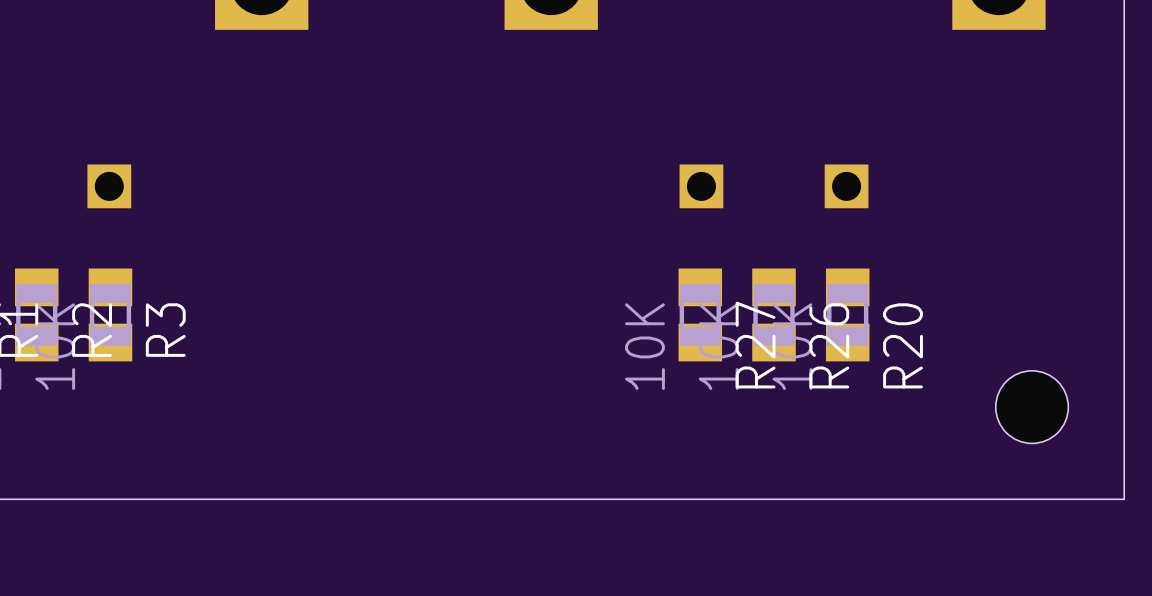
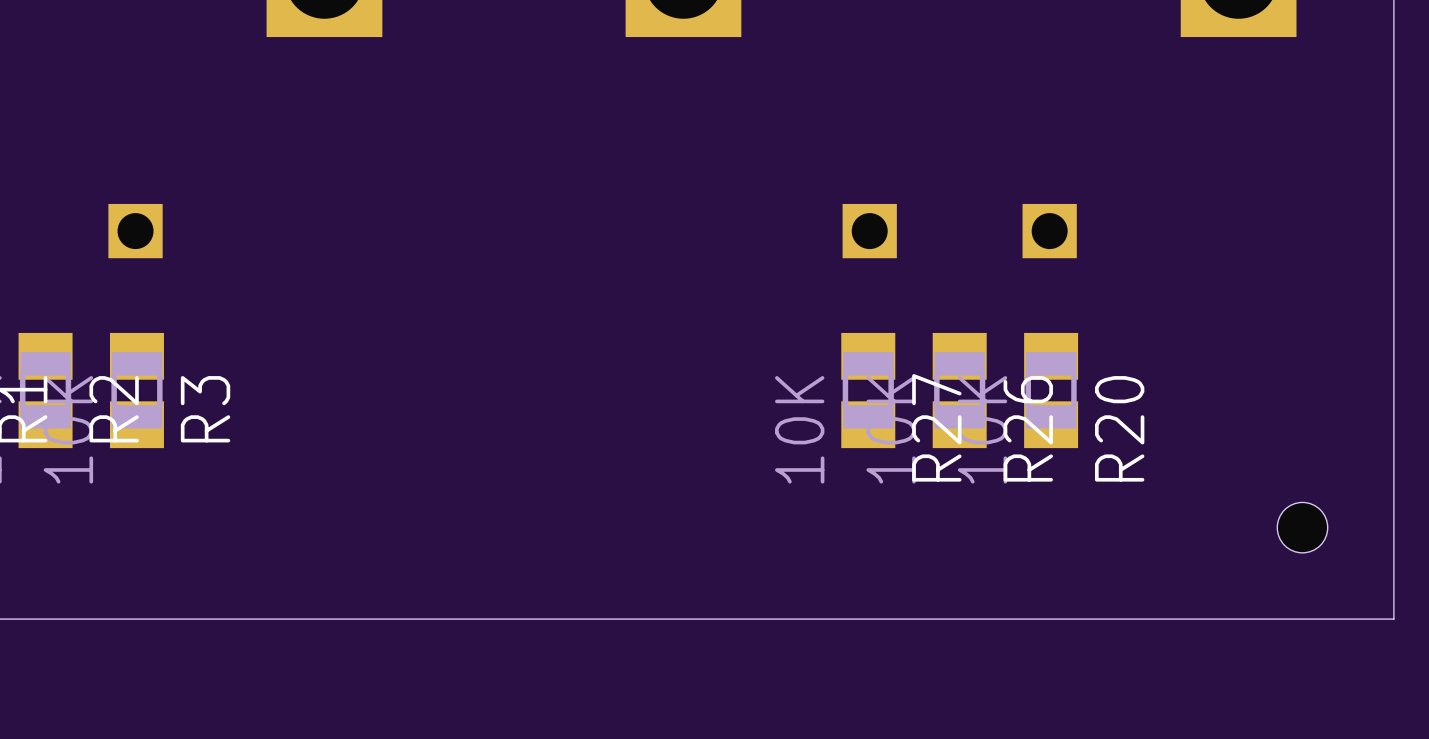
hole size: [995, 370, 1069, 444] -> [1277, 502, 1328, 553]

